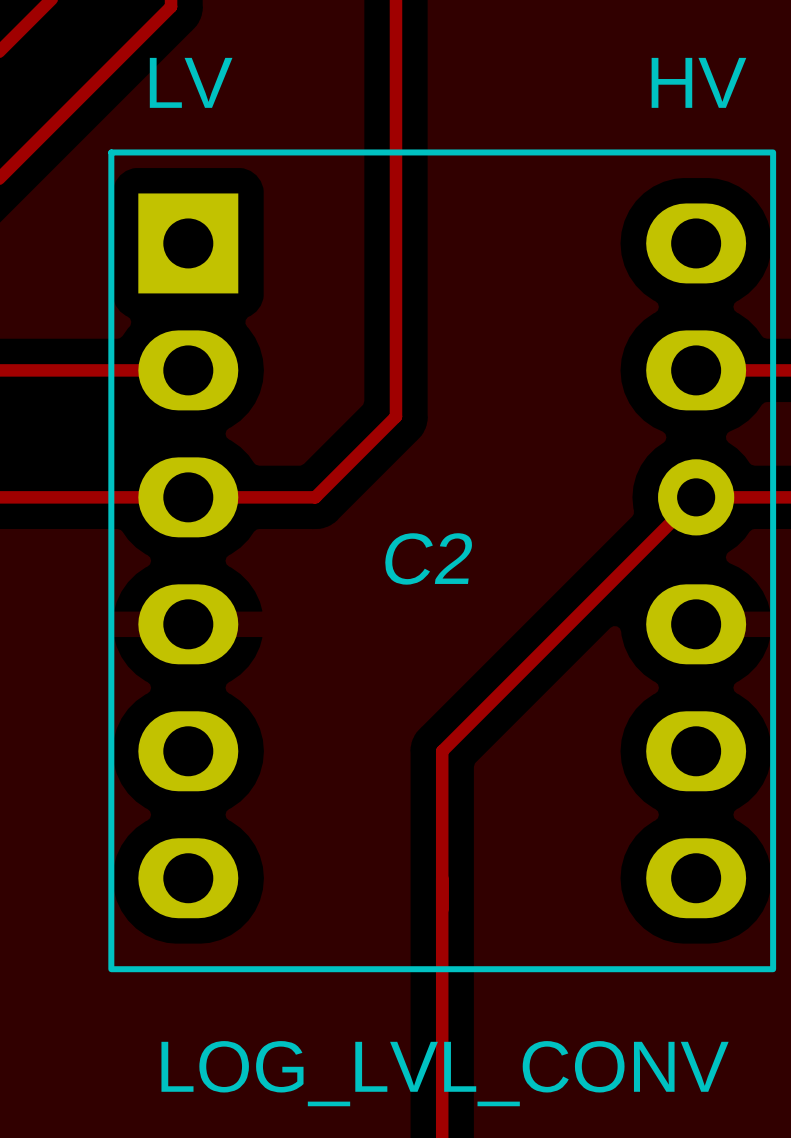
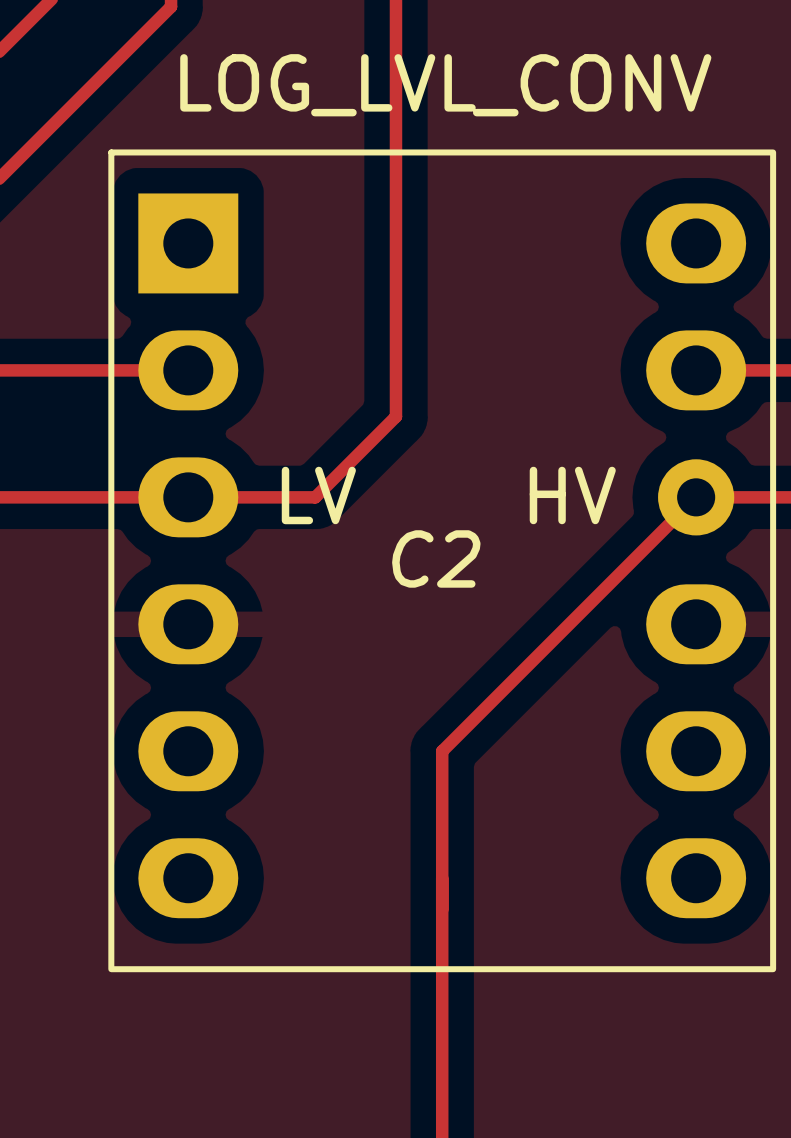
C2 text position: LV (191, 82) -> LV (318, 495)
C2 text position: HV (698, 82) -> HV (572, 495)
C2 text position: LOG_LVL_CONV (445, 1073) -> LOG_LVL_CONV (445, 85)

